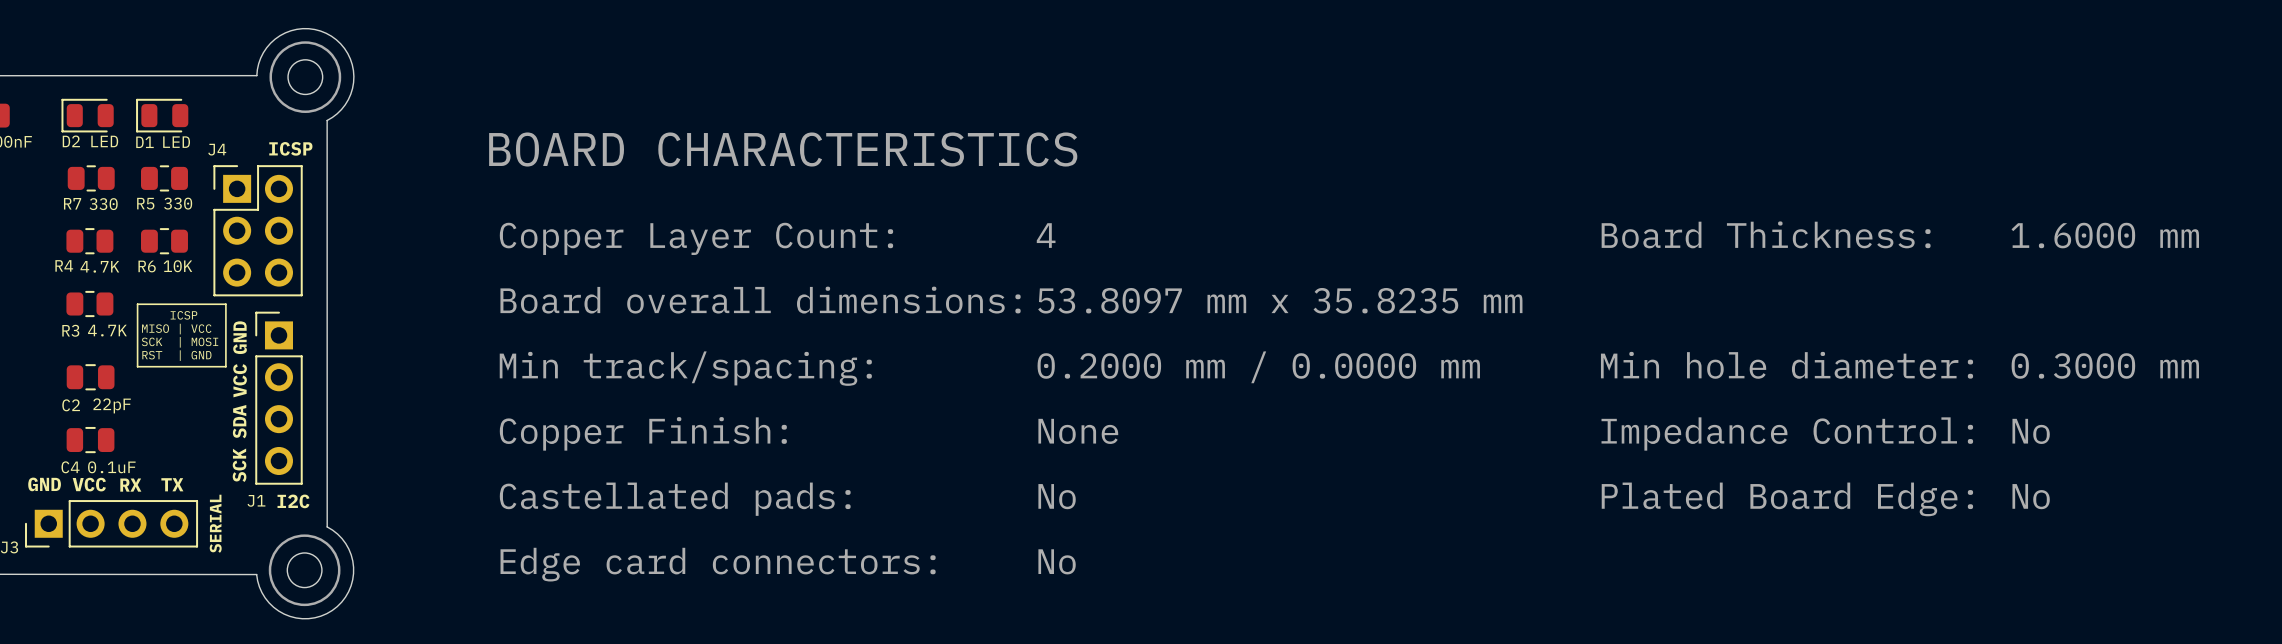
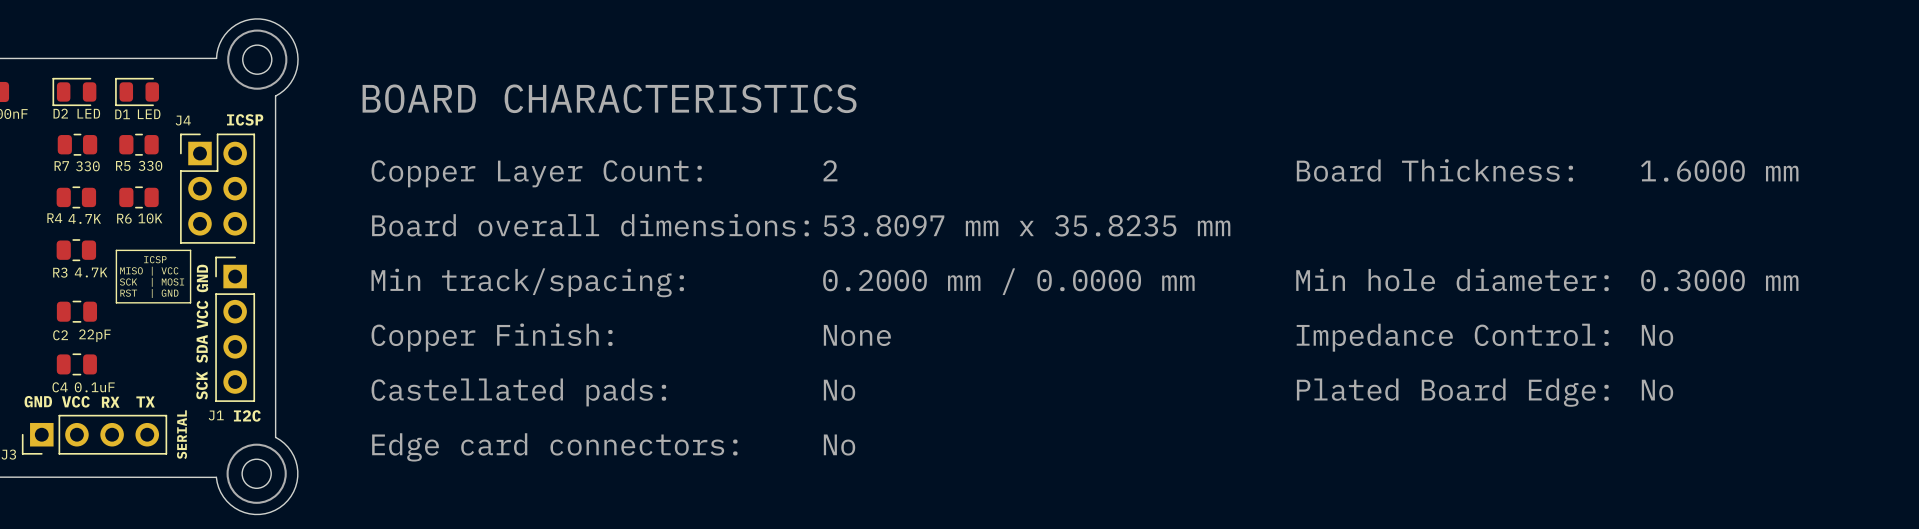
text position: BOARD CHARACTERISTICS (783, 149) -> BOARD CHARACTERISTICS (609, 98)
text: none -> 2 (830, 170)
text position: Board Thickness: (1766, 234) -> Board Thickness: (1434, 170)
text: 4 (1046, 235) -> none
text position: 1.6000 mm (2105, 235) -> 1.6000 mm (1719, 171)
text position: Copper Layer Count: (696, 238) -> Copper Layer Count: (536, 173)
text position: Board overall dimensions: (760, 300) -> Board overall dimensions: (590, 225)
text position: 53.8097 mm x 35.8235 mm (1280, 300) -> 53.8097 mm x 35.8235 mm (1026, 225)
text position: Min hole diameter: (1787, 365) -> Min hole diameter: (1452, 279)
text position: 0.3000 mm (2105, 365) -> 0.3000 mm (1719, 280)
text position: 0.2000 mm / 0.0000 mm (1258, 367) -> 0.2000 mm / 0.0000 mm (1008, 281)
text position: Min track/spacing: (685, 368) -> Min track/spacing: (527, 282)
text: none -> No (1657, 335)
text position: None (1078, 431) -> None (857, 335)
text: No (2031, 431) -> none
text position: Copper Finish: (643, 433) -> Copper Finish: (492, 337)
text position: Impedance Control: (1787, 433) -> Impedance Control: (1452, 337)
text: none -> No (839, 390)
text: none -> No (1657, 390)
text: No (1057, 496) -> none
text: No (2031, 496) -> none
text position: Castellated pads: (675, 499) -> Castellated pads: (518, 392)
text position: Plated Board Edge: (1787, 499) -> Plated Board Edge: (1452, 392)
text: none -> No (839, 445)
text: No (1057, 561) -> none
text position: Edge card connectors: (718, 564) -> Edge card connectors: (554, 447)

